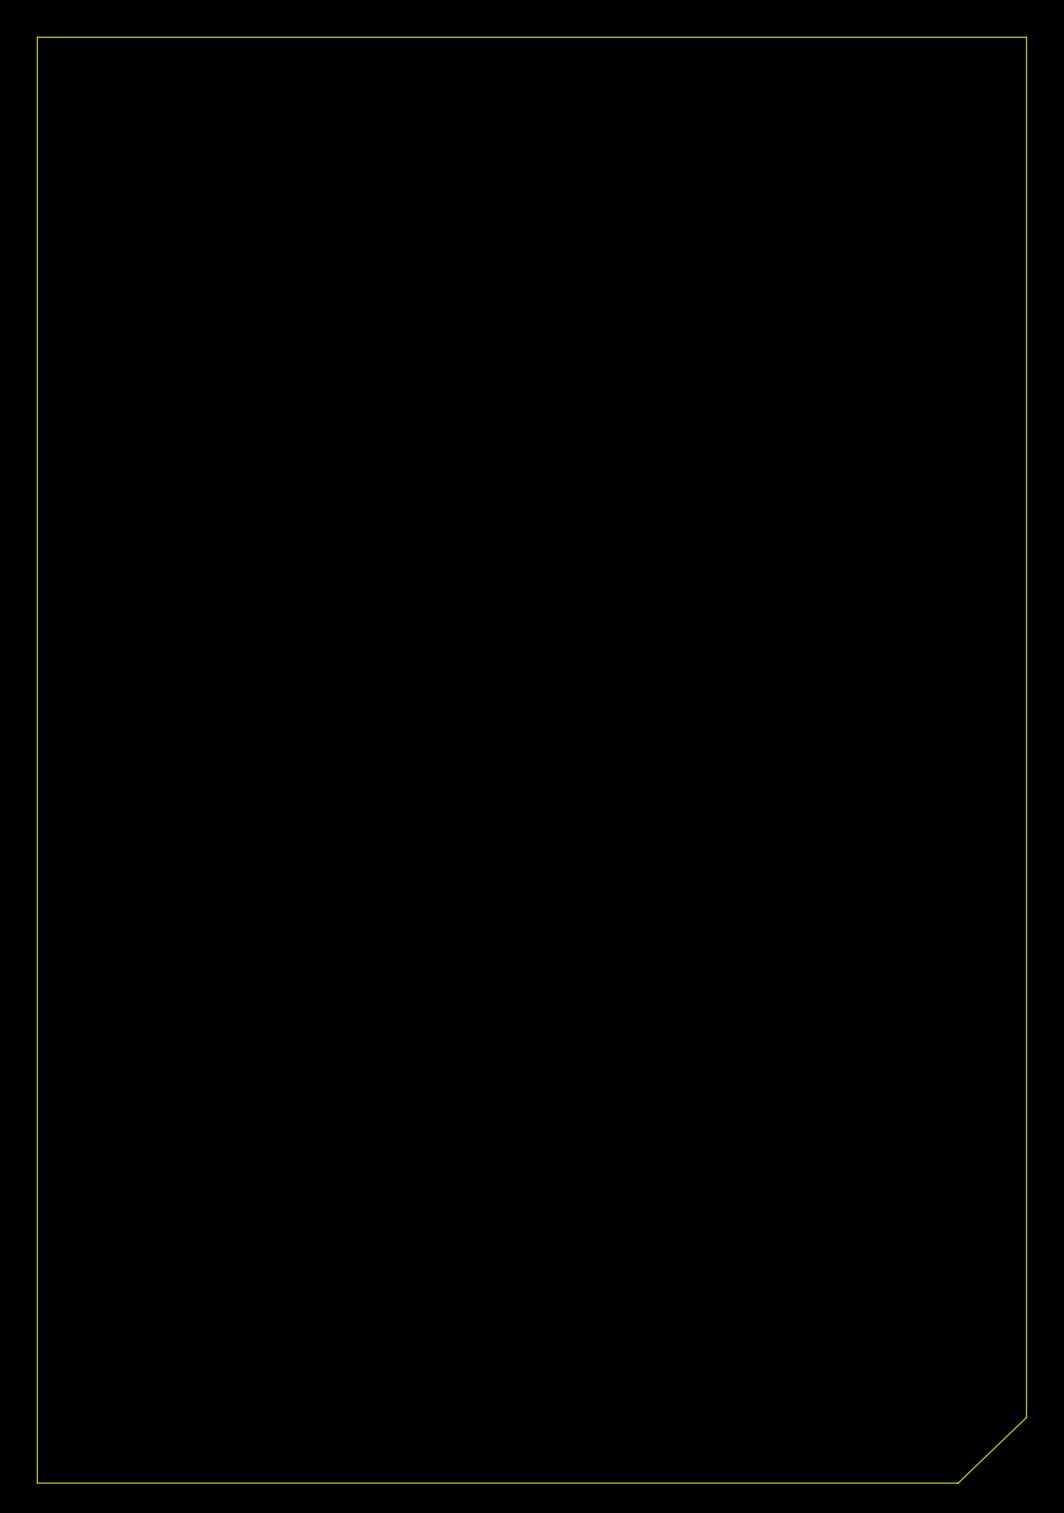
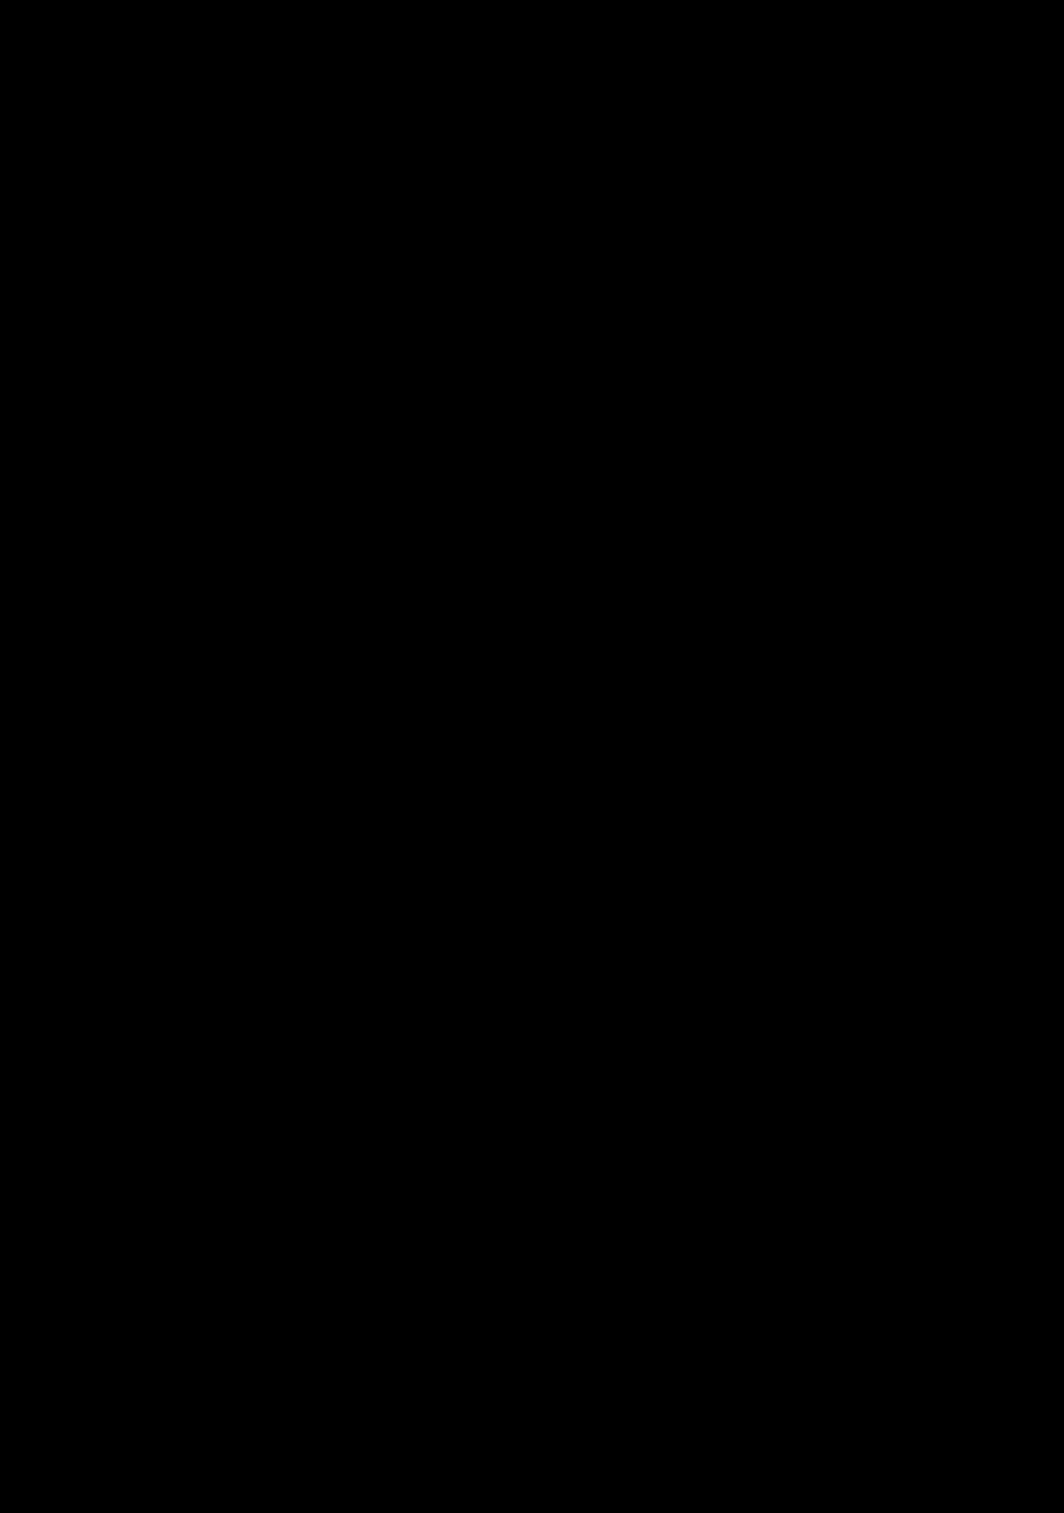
board edge: (37, 37) (1026, 37) (1026, 1417) (958, 1483) (37, 1483) (37, 37) -> none

